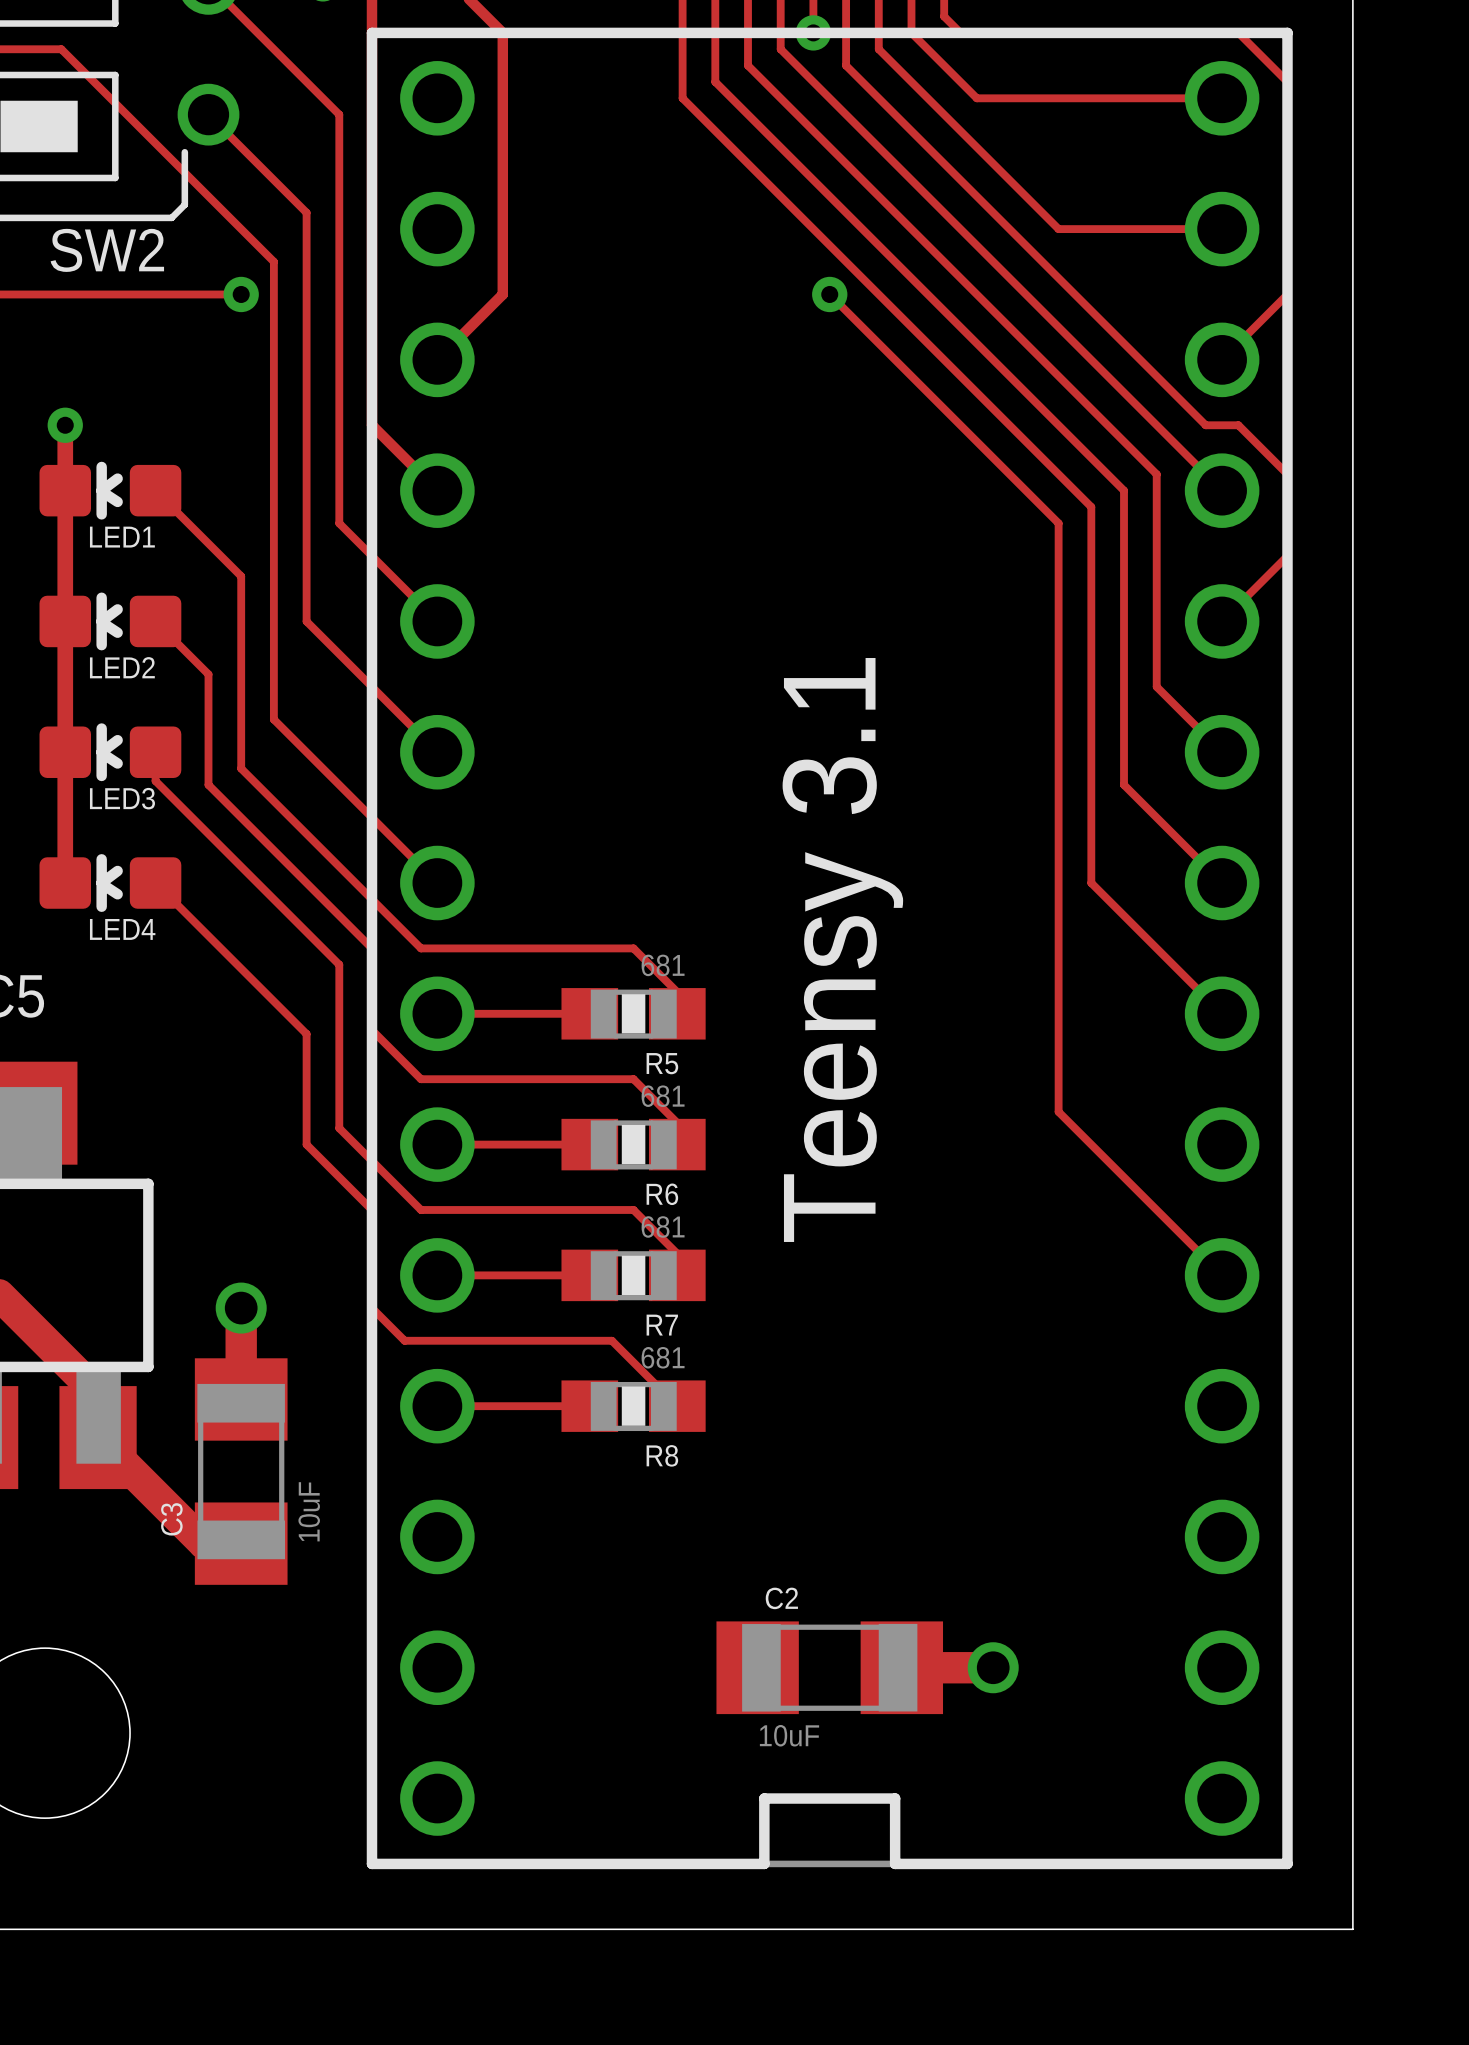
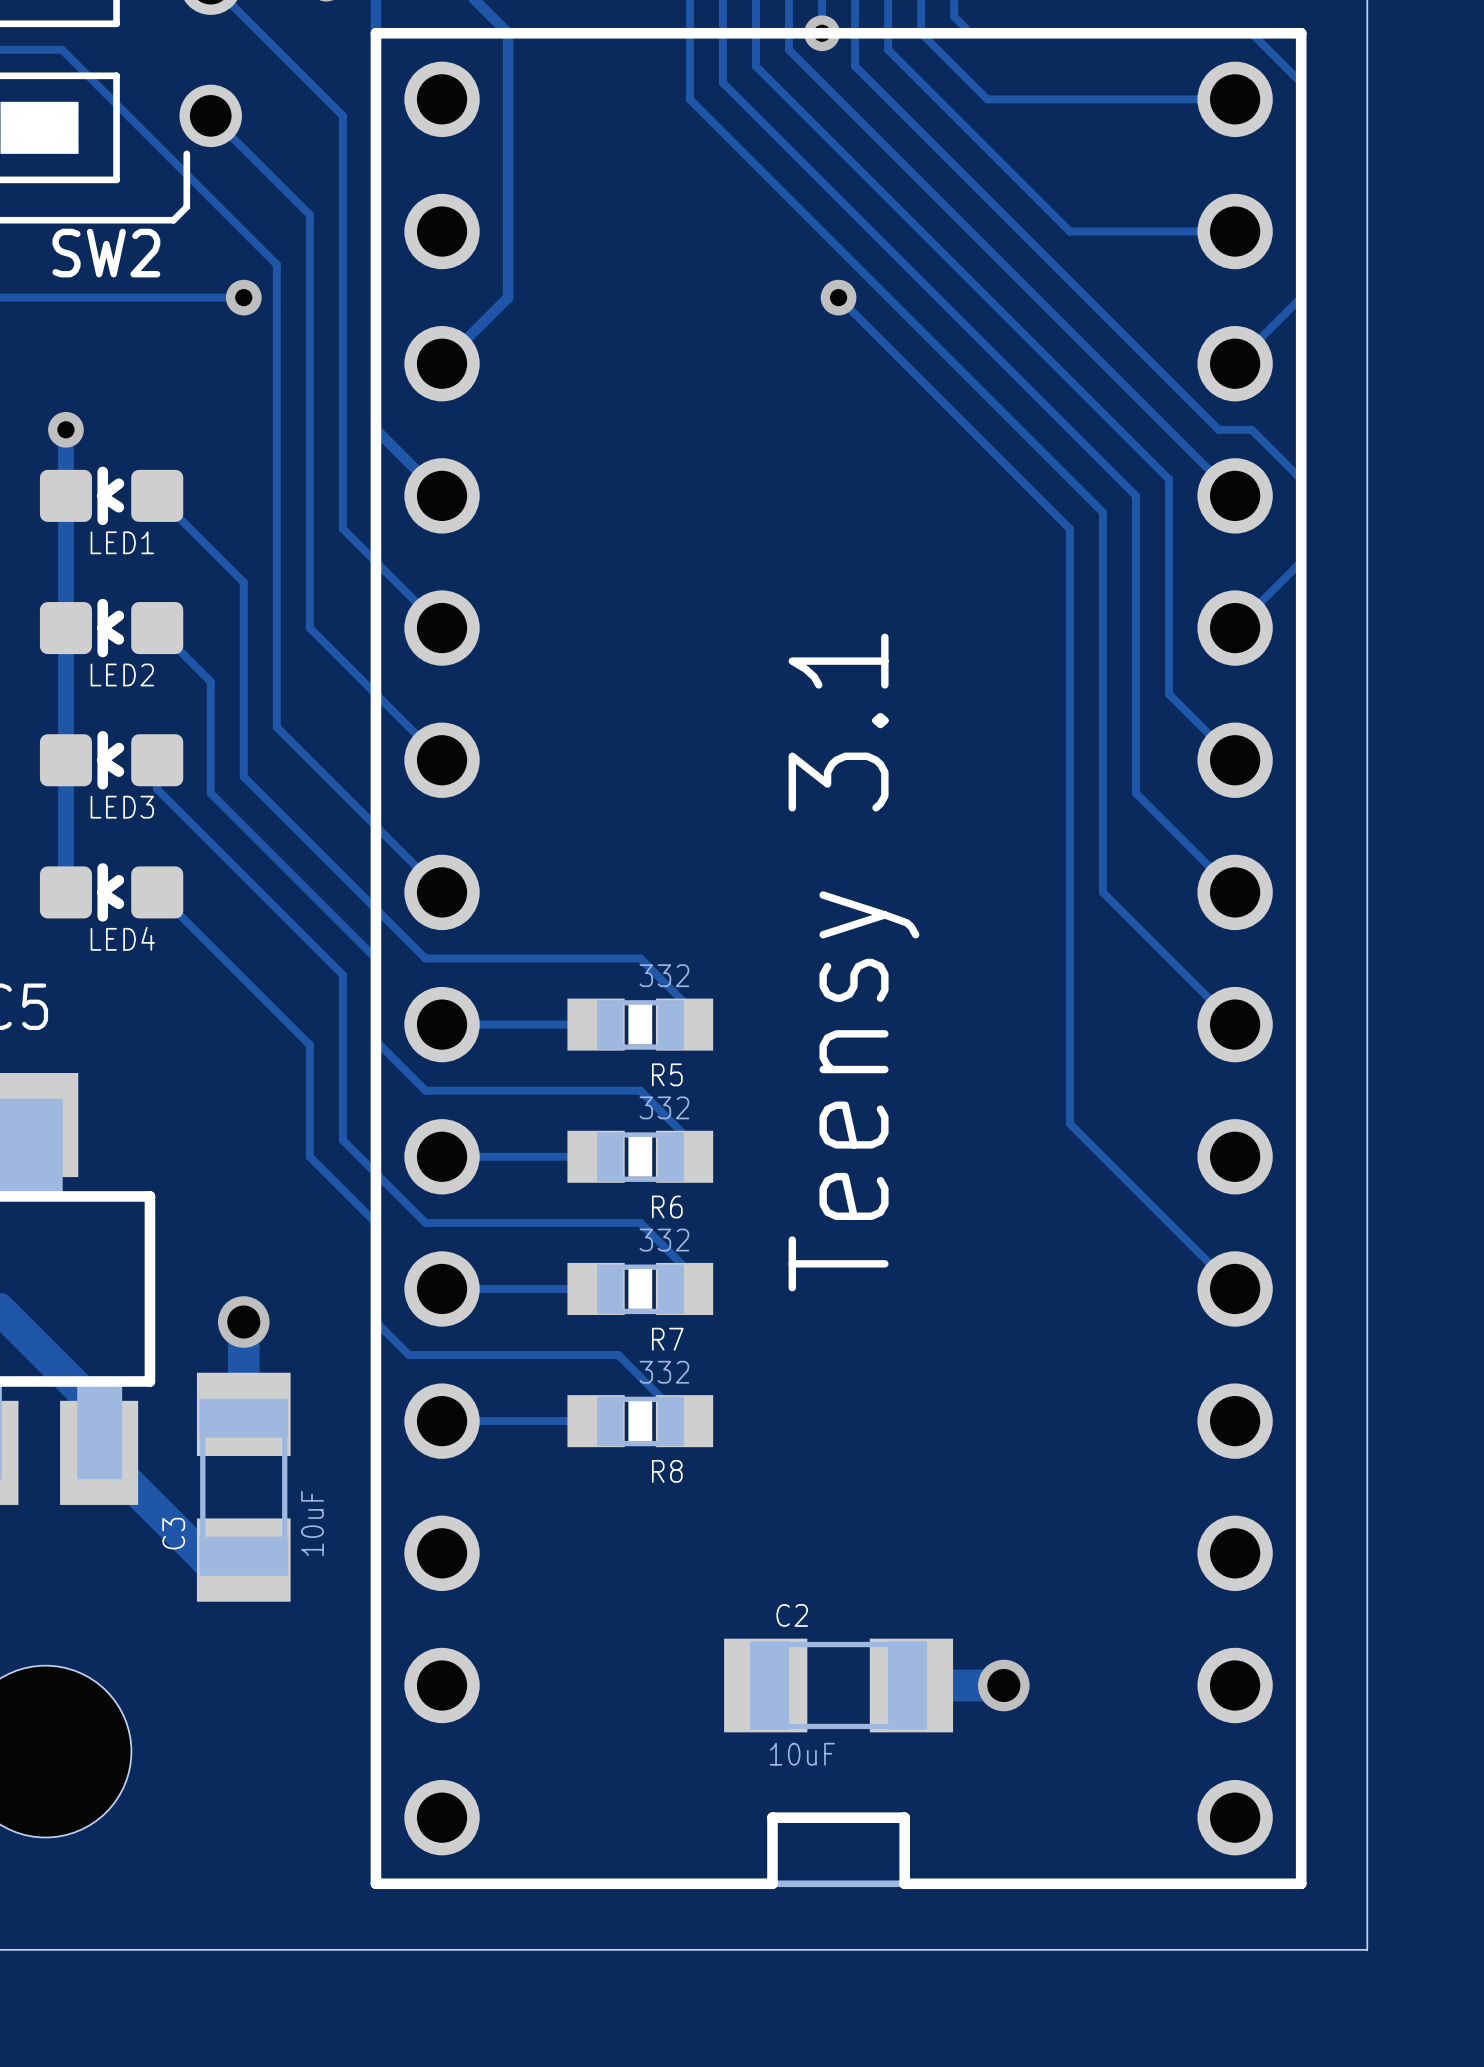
R5 value: 681 (663, 965) -> 332 (664, 975)
R6 value: 681 (663, 1096) -> 332 (664, 1107)
R7 value: 681 (663, 1226) -> 332 (664, 1240)
R8 value: 681 (663, 1357) -> 332 (664, 1372)

